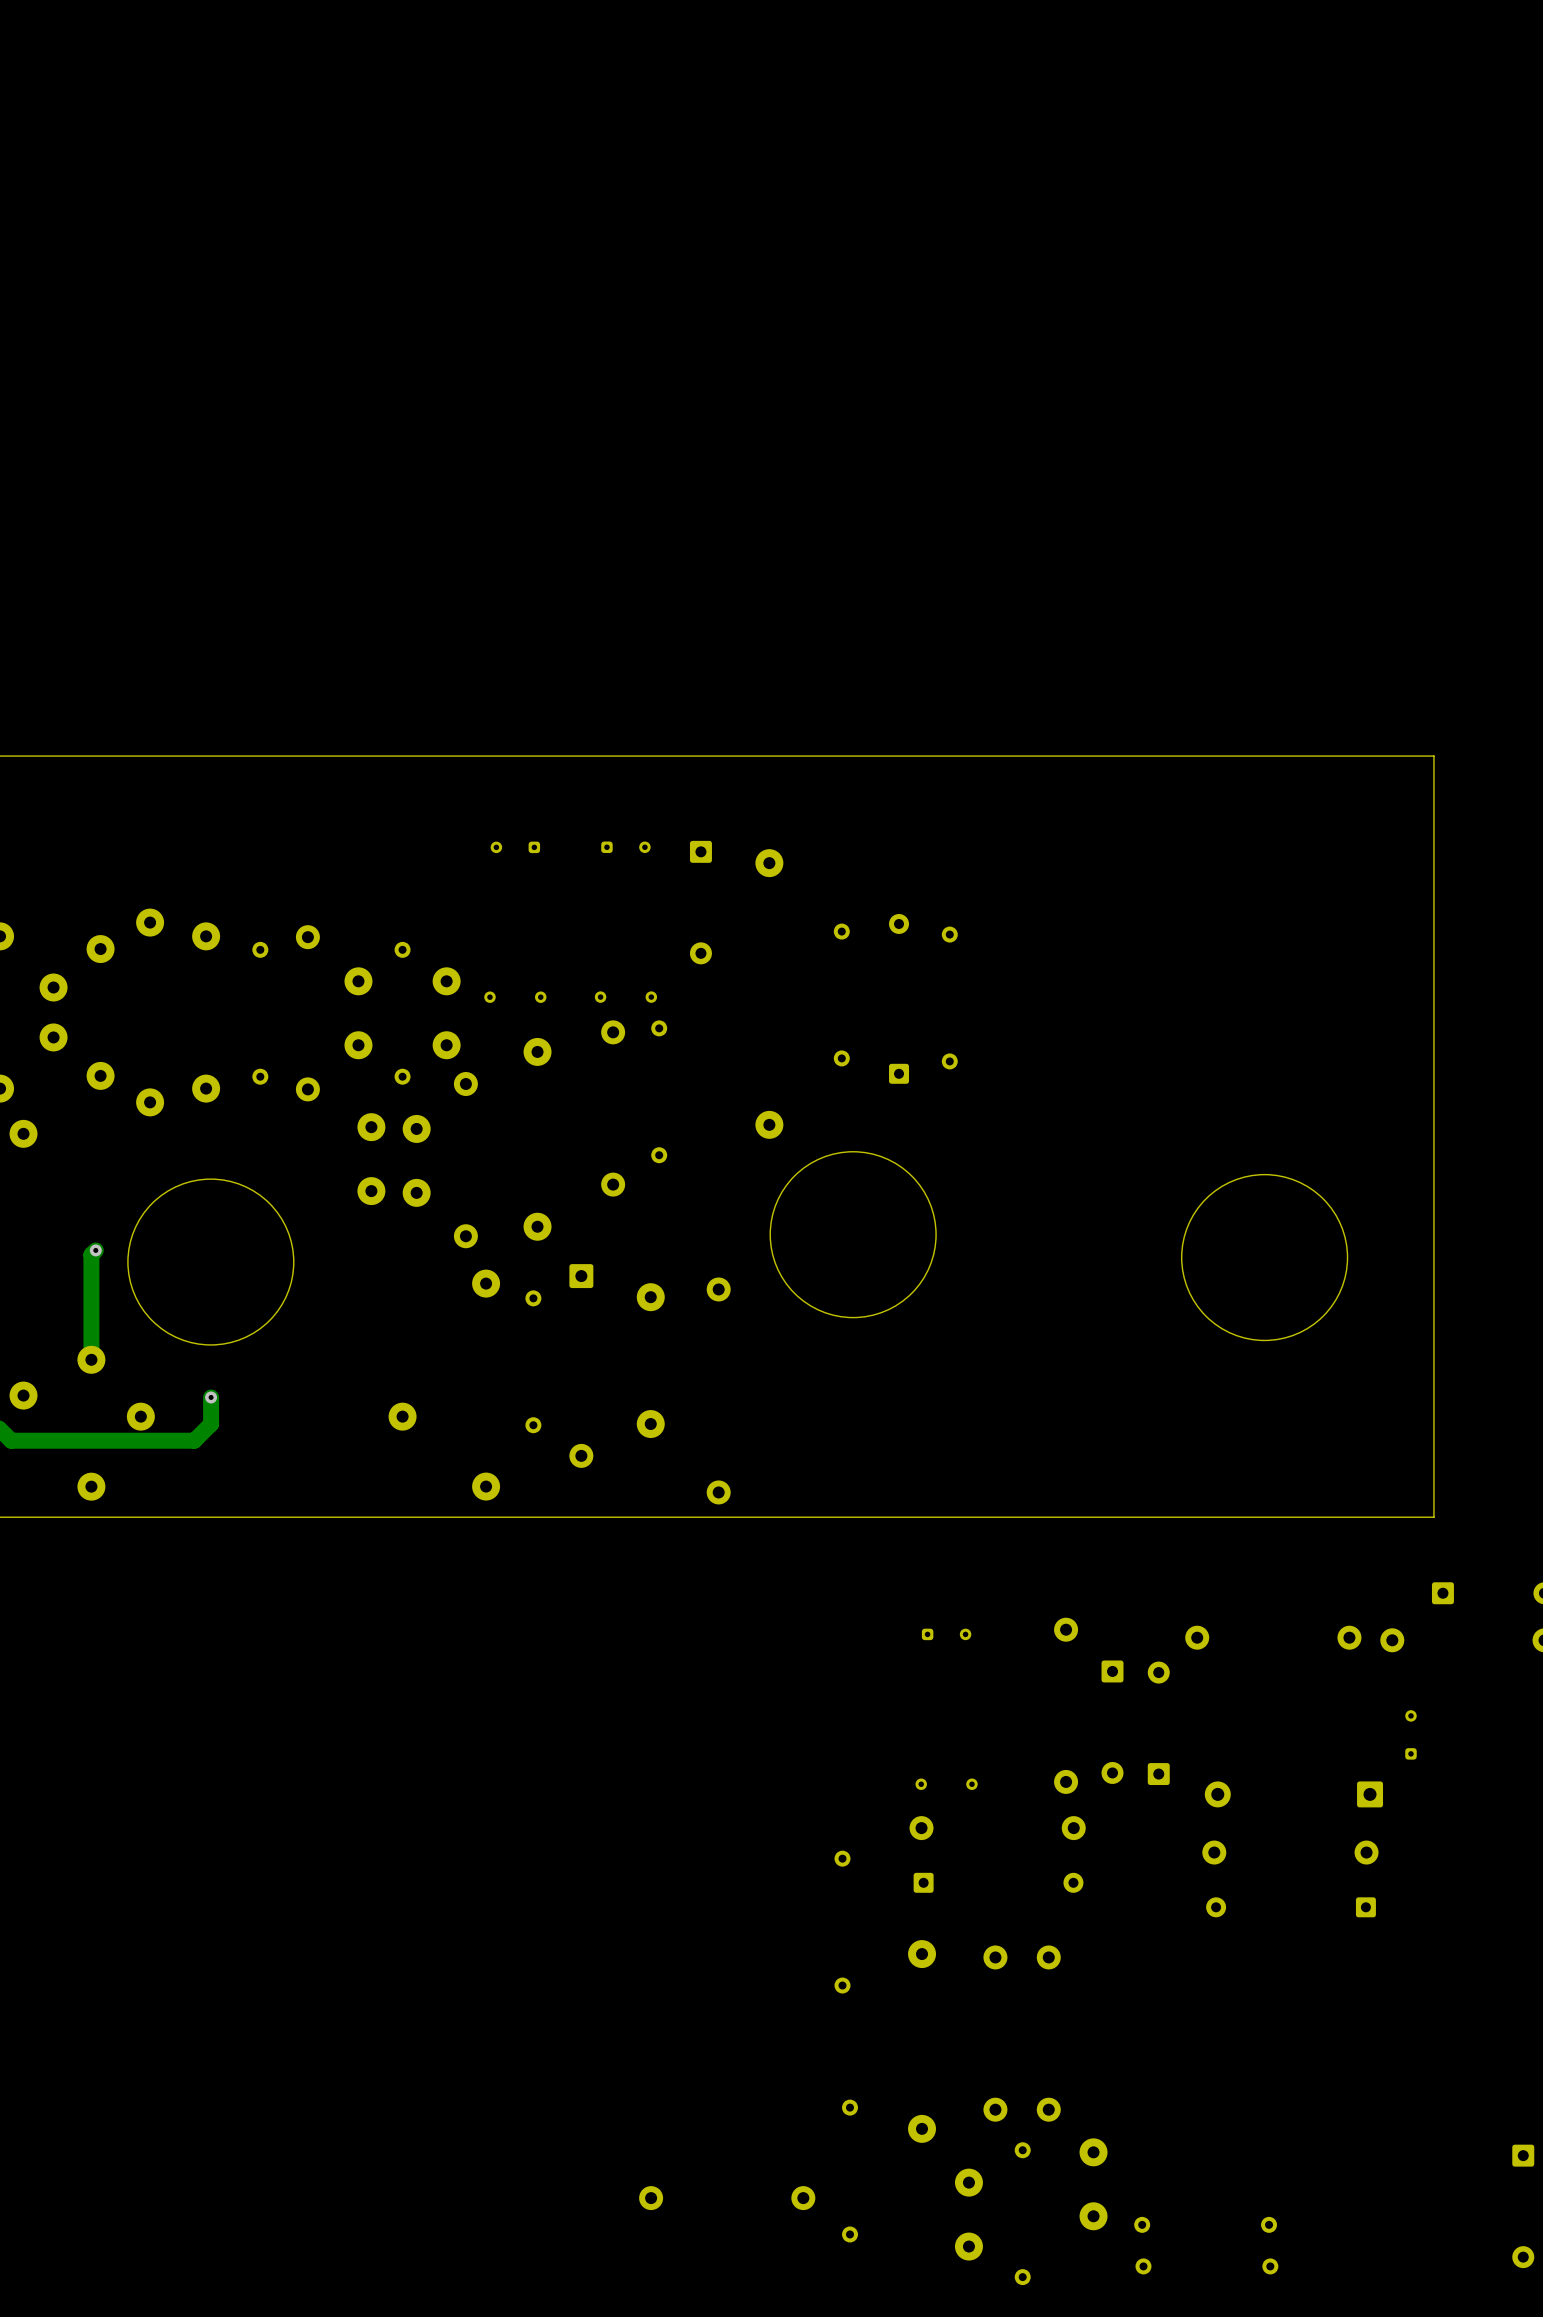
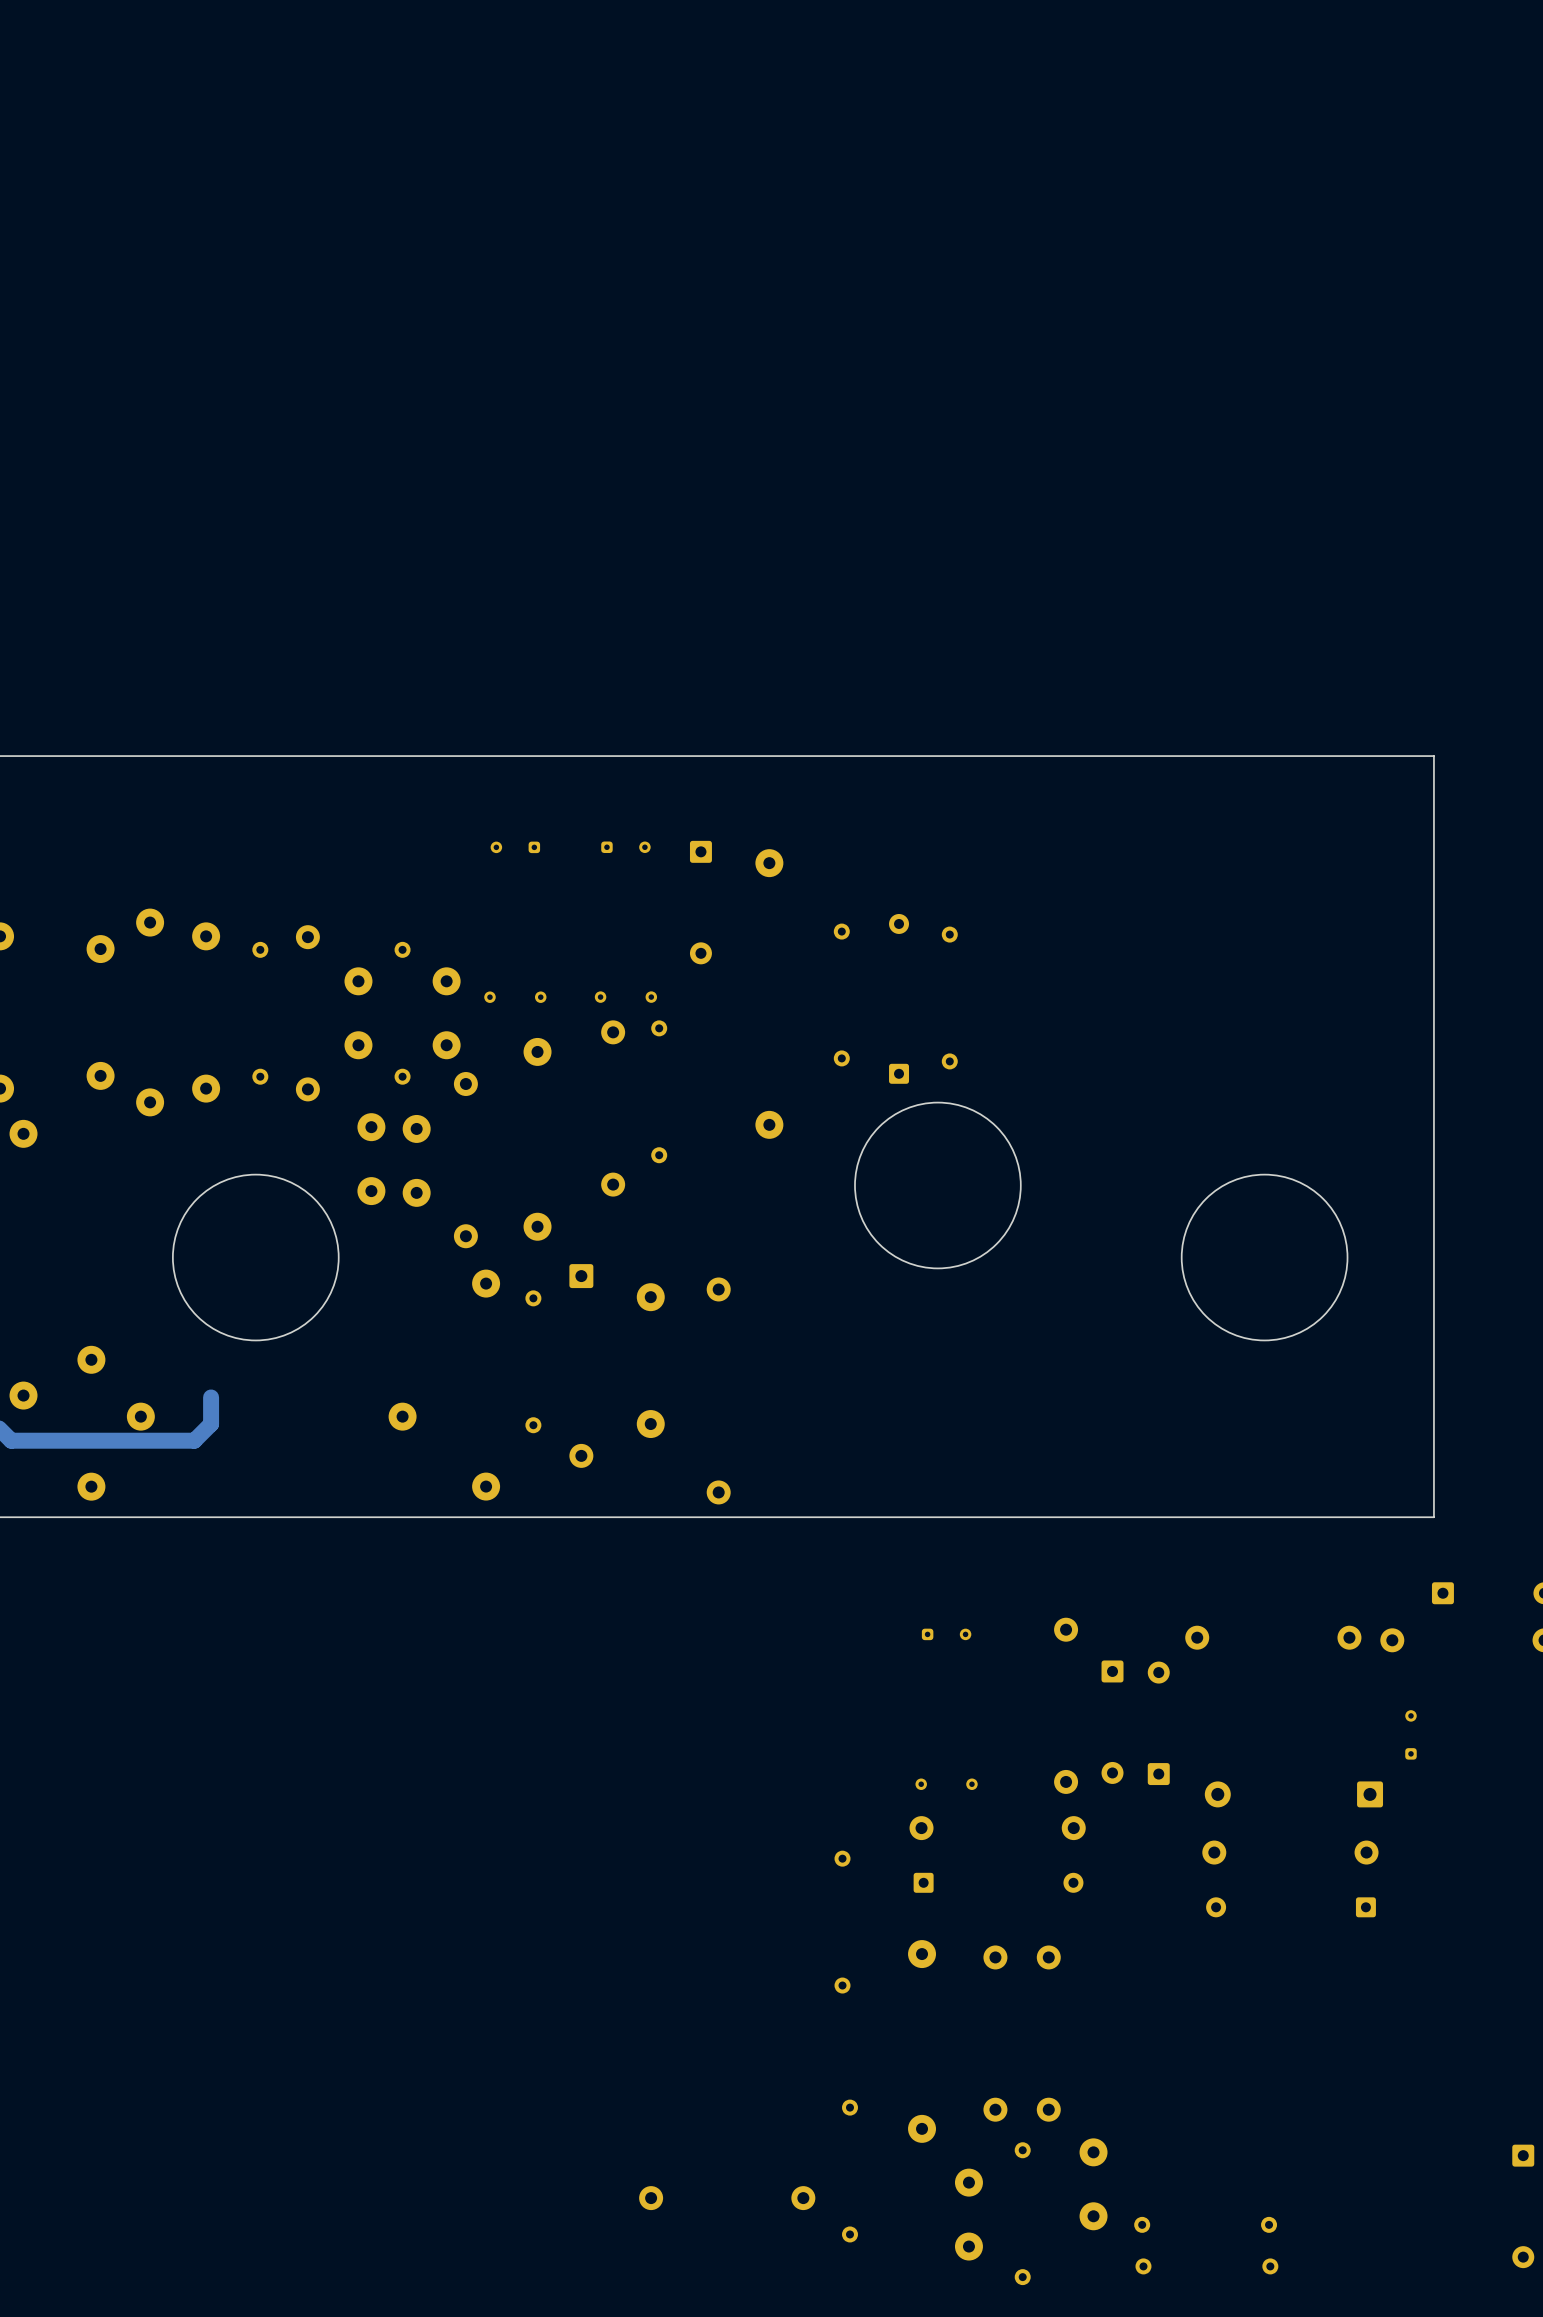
part: (53, 1012) -> none
part position: (853, 1234) -> (937, 1185)
track: (95, 1250) (91, 1254) (91, 1359) -> none
via: (95, 1250) -> none
part position: (210, 1262) -> (255, 1257)
via: (211, 1397) -> none

